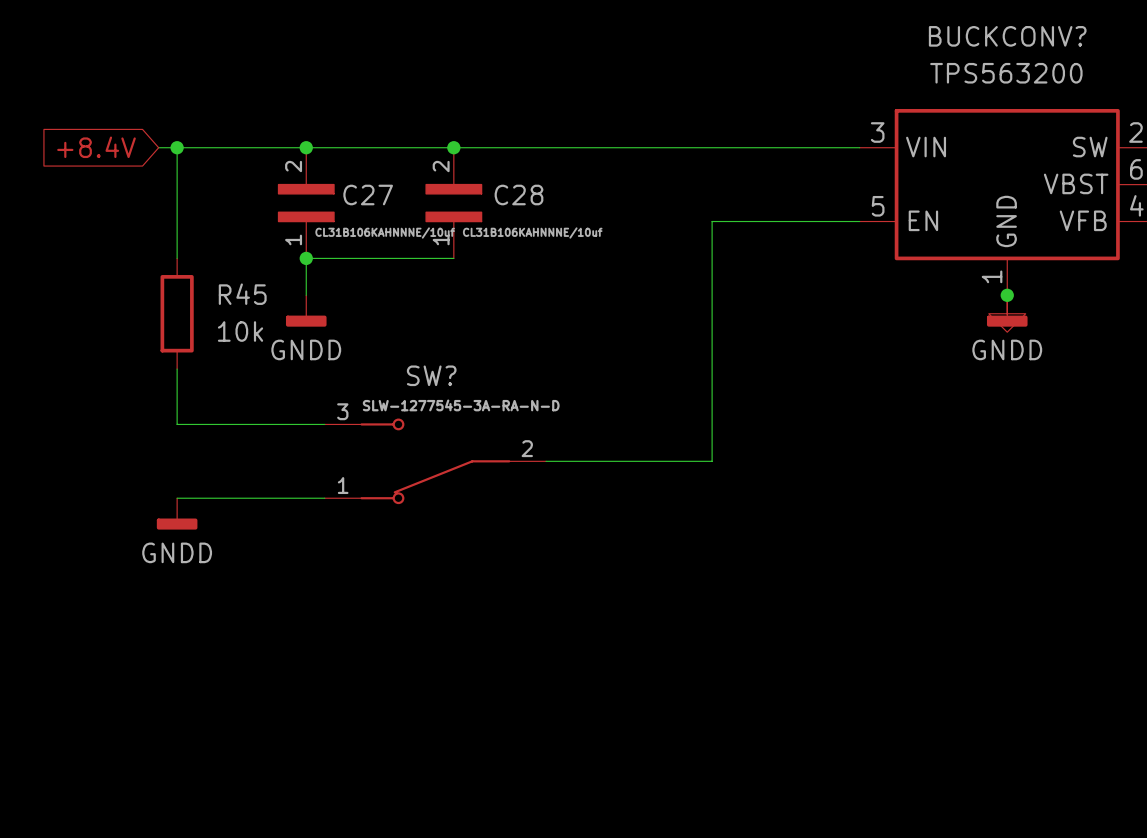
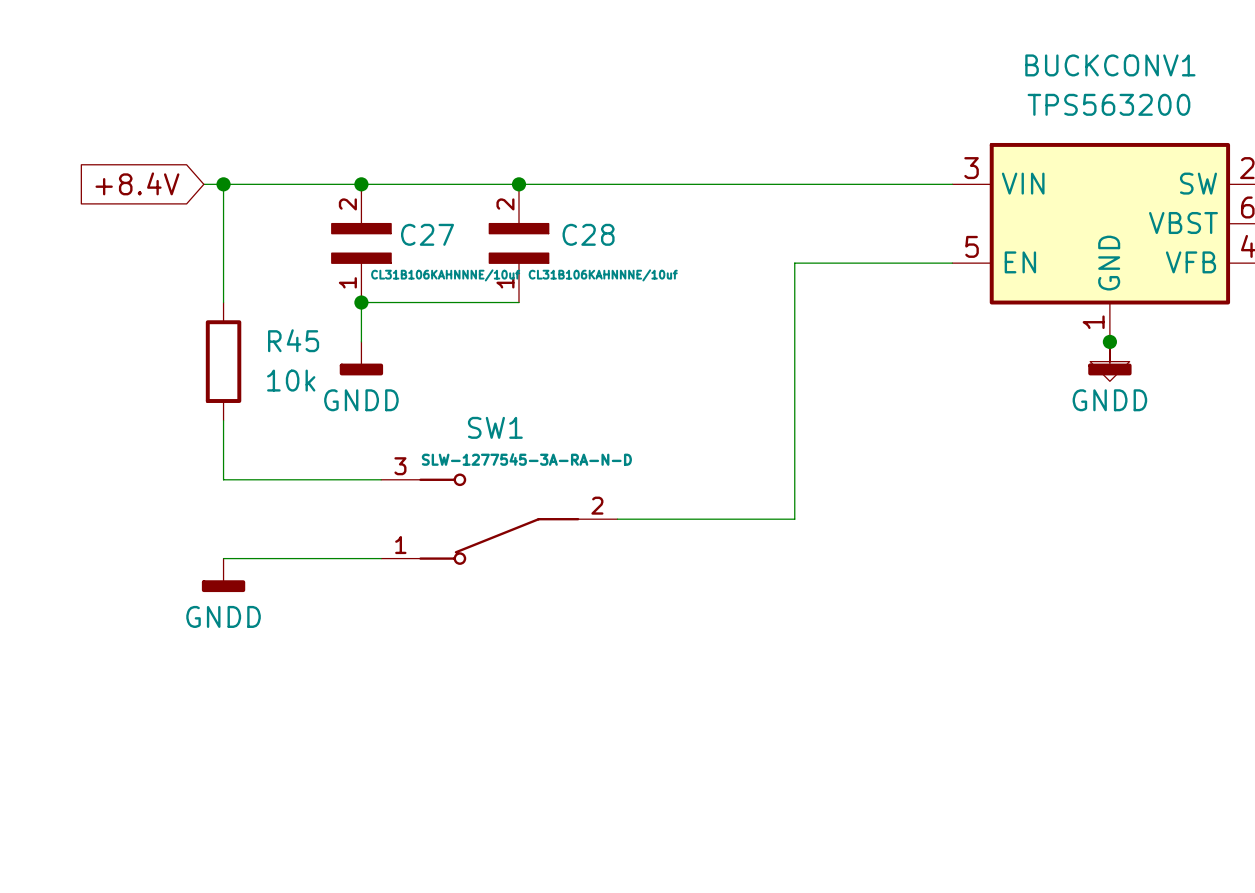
BUCKCONV? name: BUCKCONV? (1007, 36) -> BUCKCONV1 (1110, 65)
SW? name: SW? (431, 375) -> SW1 (495, 427)

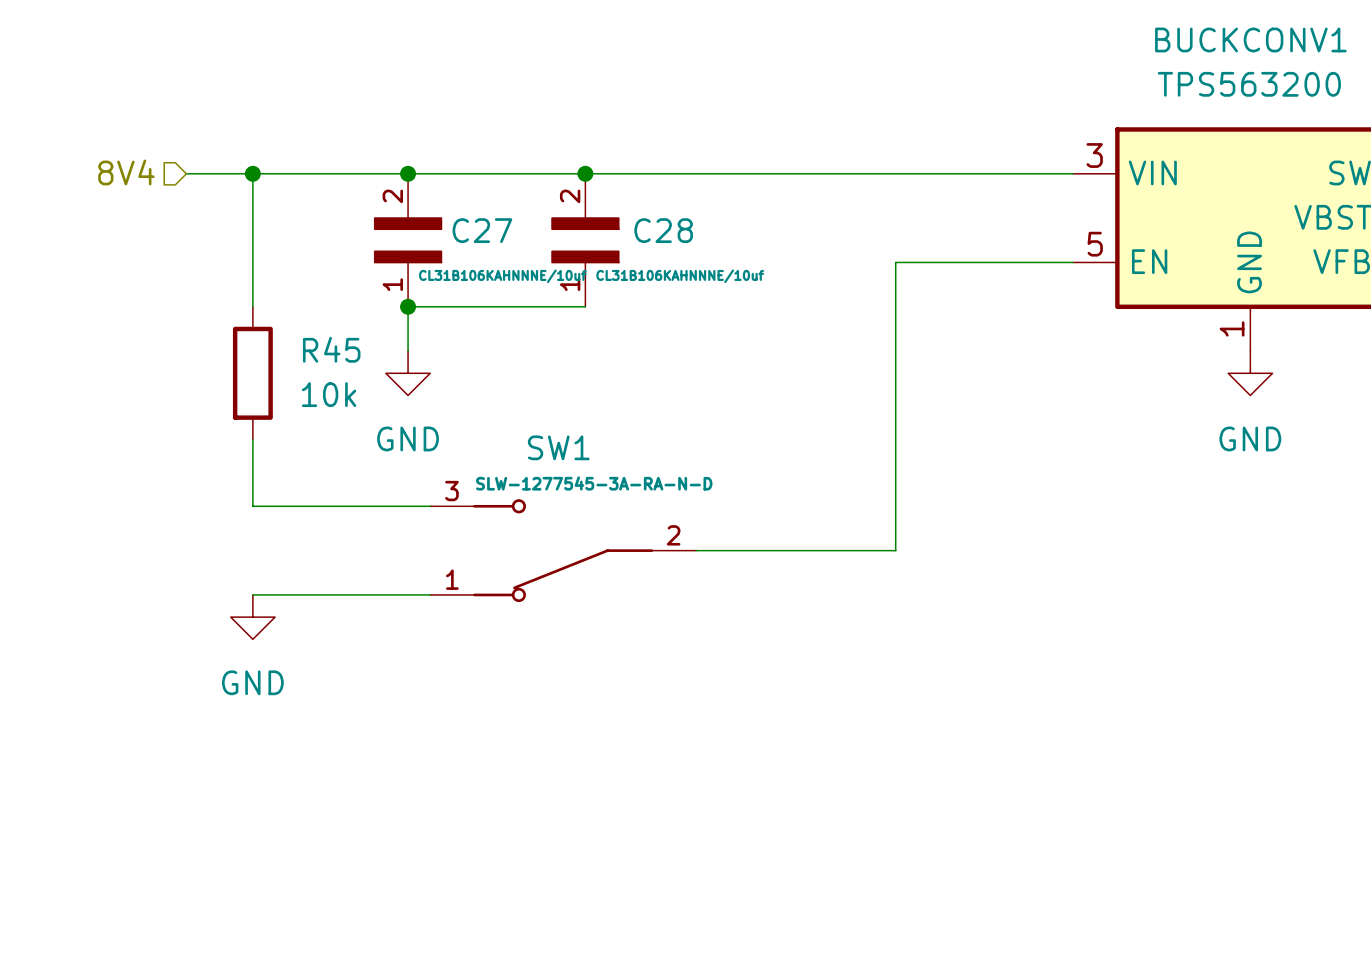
hierarchical label: none -> 8V4 (126, 172)
global label: +8.4V (137, 183) -> none
wire: none -> (186, 173) (230, 173)
junction: (1109, 341) -> none
power symbol: GNDD (361, 358) -> GND (408, 373)
power symbol: GNDD (1109, 358) -> none
power symbol text: none -> GND (1250, 438)
power symbol: GNDD (223, 575) -> GND (252, 617)

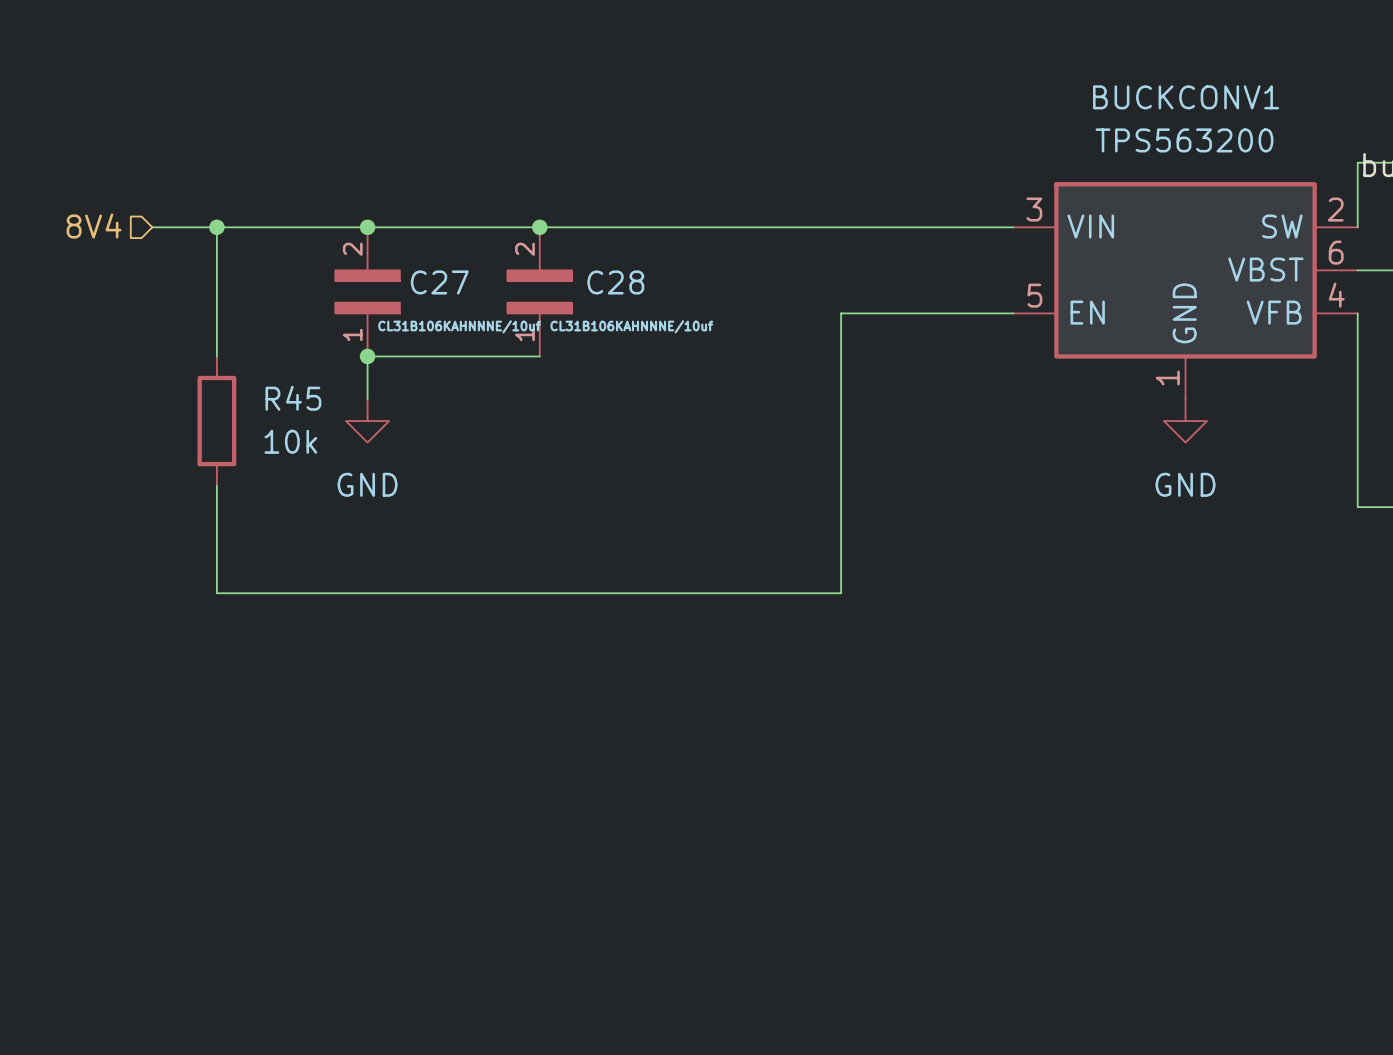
wire: (252, 506) (430, 506) -> (216, 550) (216, 593) (647, 593)
SW1: SLW-1277545-3A-RA-N-D (563, 550) -> none
wire: (252, 594) (430, 594) -> none
power symbol: GND (252, 617) -> none

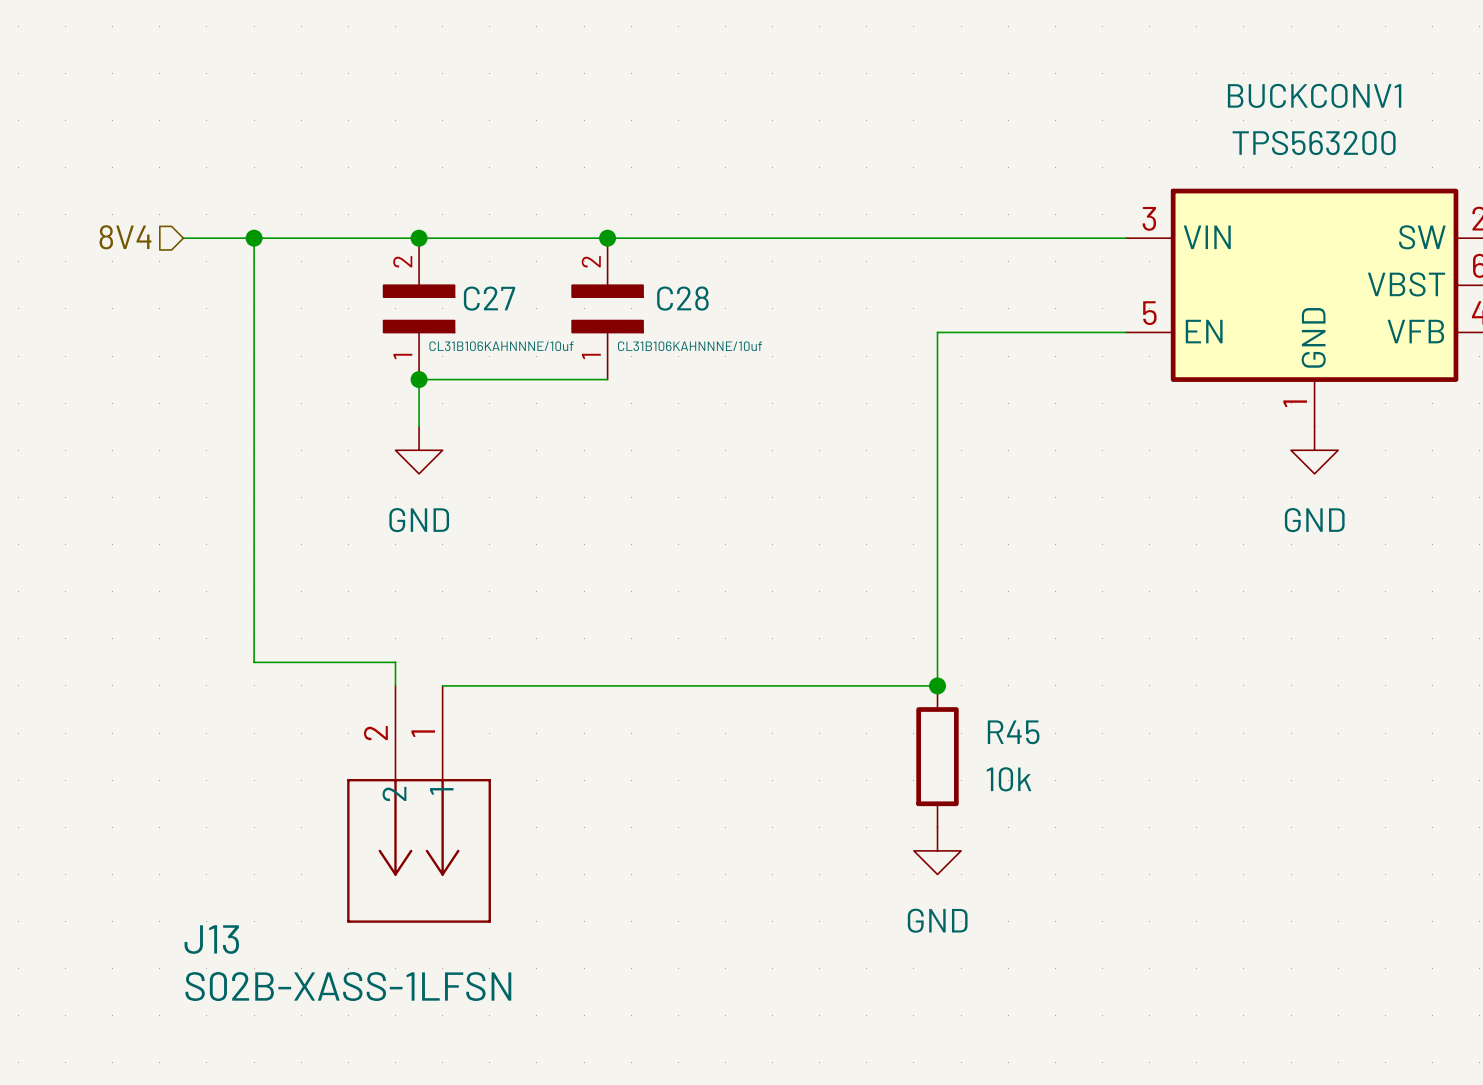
wire: none -> (254, 379) (254, 520)
R45 position: (216, 421) -> (937, 756)
wire: (216, 593) (841, 593) -> (442, 685) (937, 685) (937, 638)
wire: none -> (254, 638) (254, 662) (395, 662) (395, 685)
junction: none -> (937, 685)
J13: none -> S02B-XASS-1LFSN (419, 804)
power symbol: none -> GND (937, 850)

